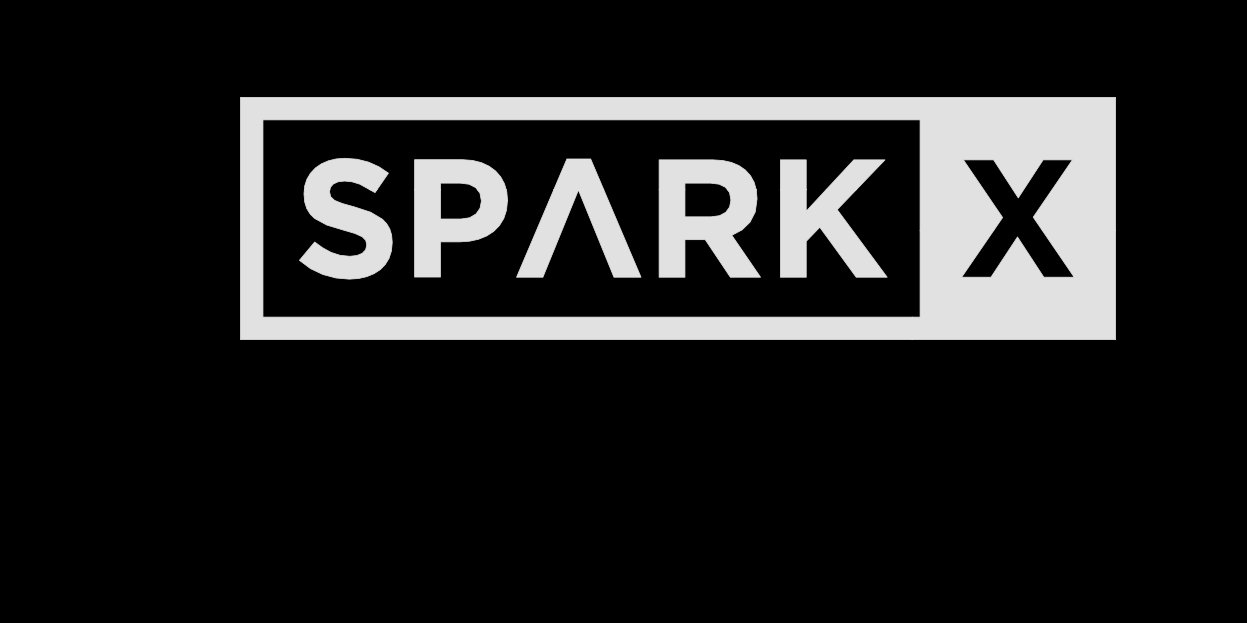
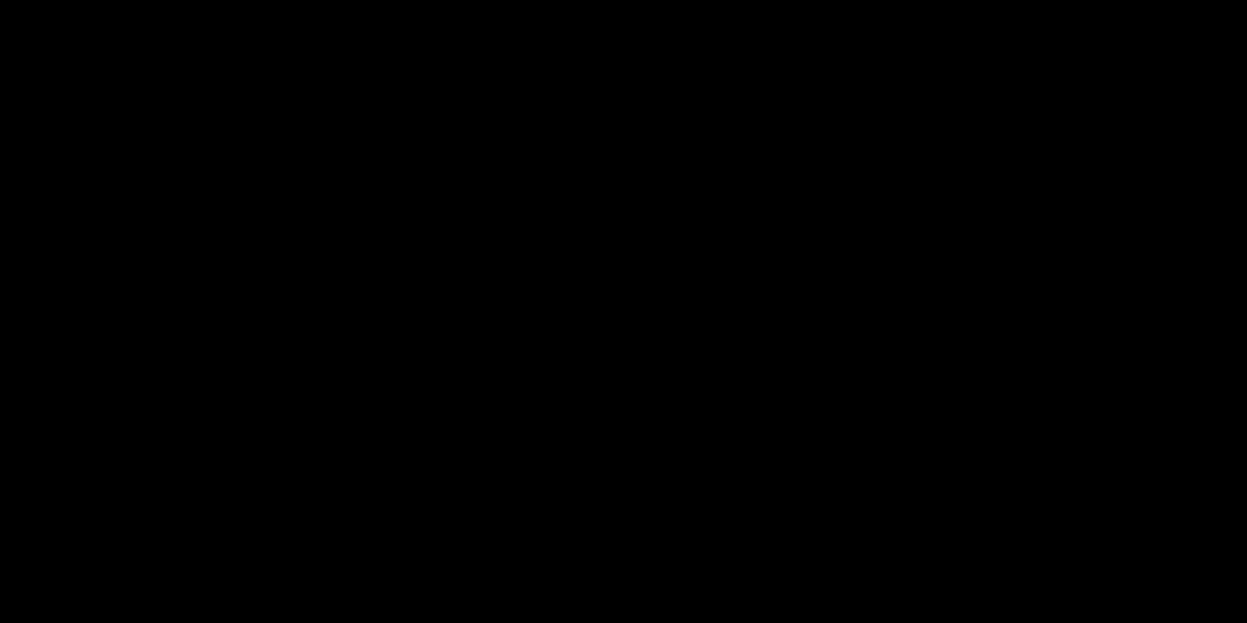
drawing: [240, 96, 1116, 340] -> none

